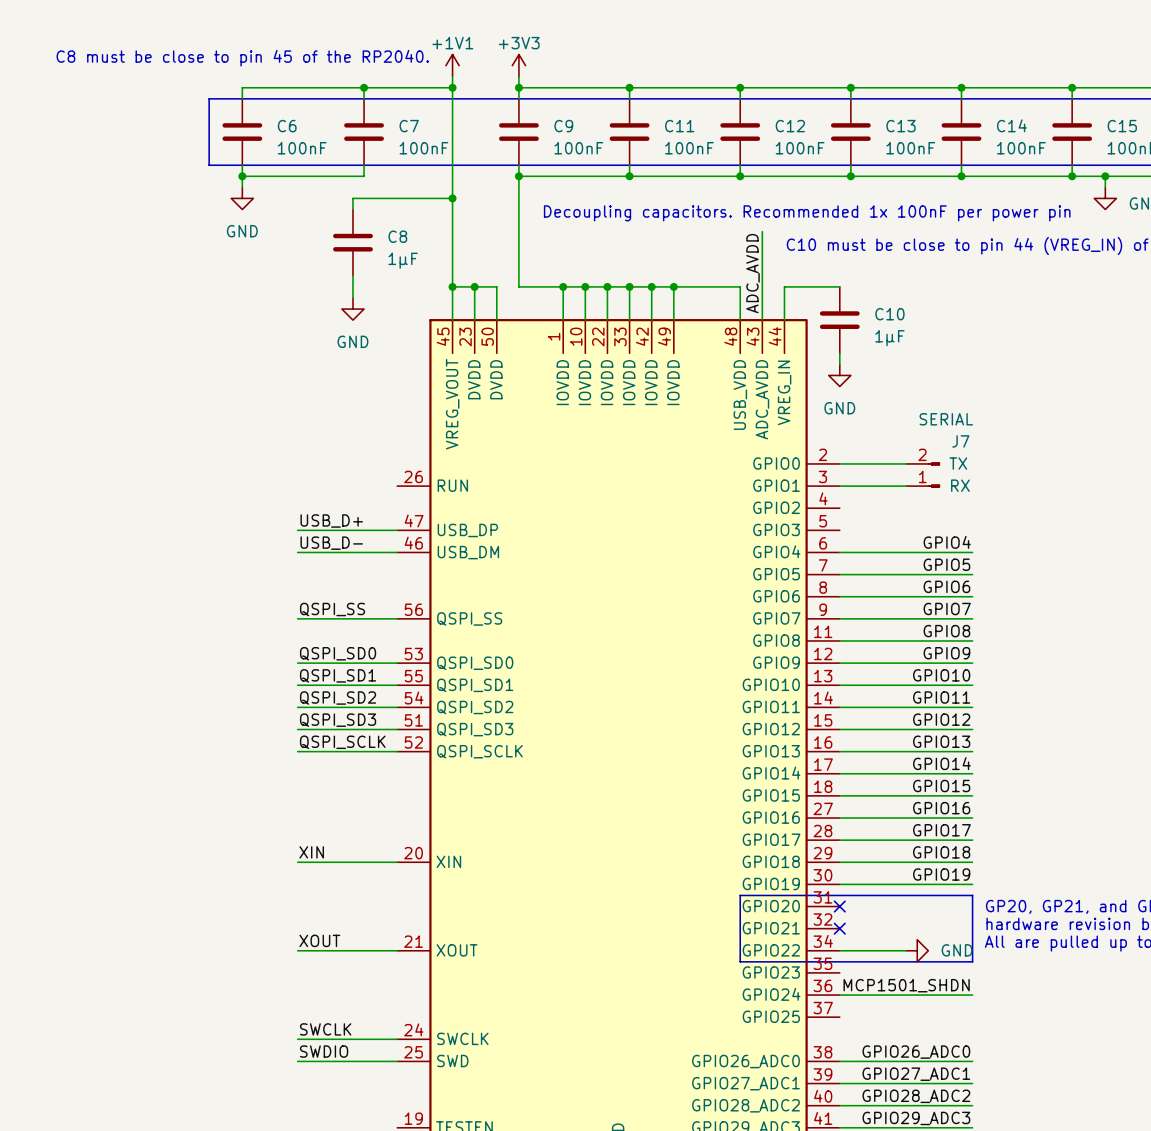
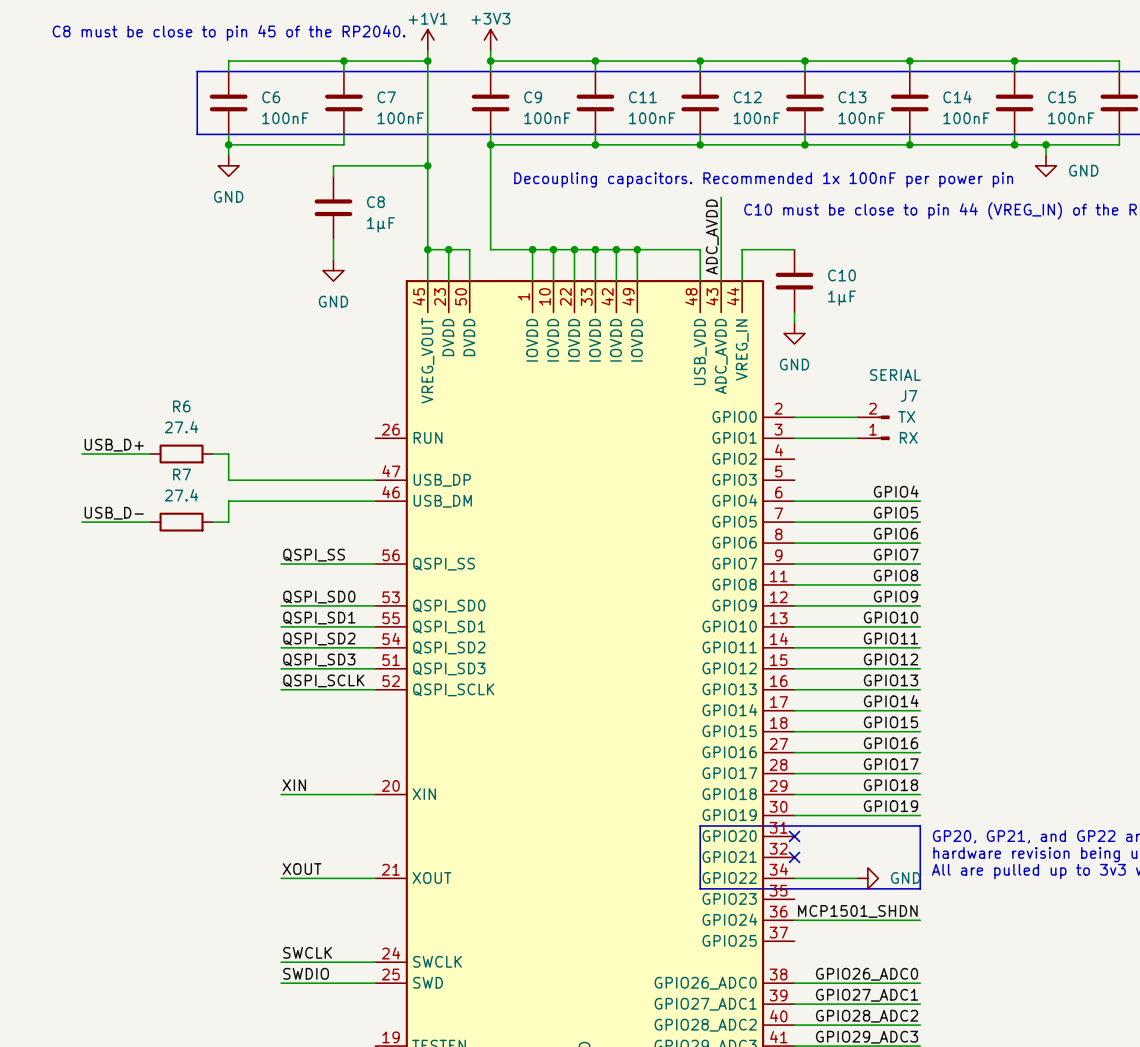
wire: none -> (81, 454) (150, 454)
R6: none -> 27.4 (181, 454)
wire: none -> (212, 454) (228, 454) (228, 480) (281, 480)
label position: USB_D+ (331, 521) -> USB_D+ (114, 445)
label position: USB_D- (331, 543) -> USB_D- (114, 513)
wire: none -> (281, 501) (228, 501) (228, 522) (212, 522)
wire: none -> (81, 522) (150, 522)
R7: none -> 27.4 (181, 522)

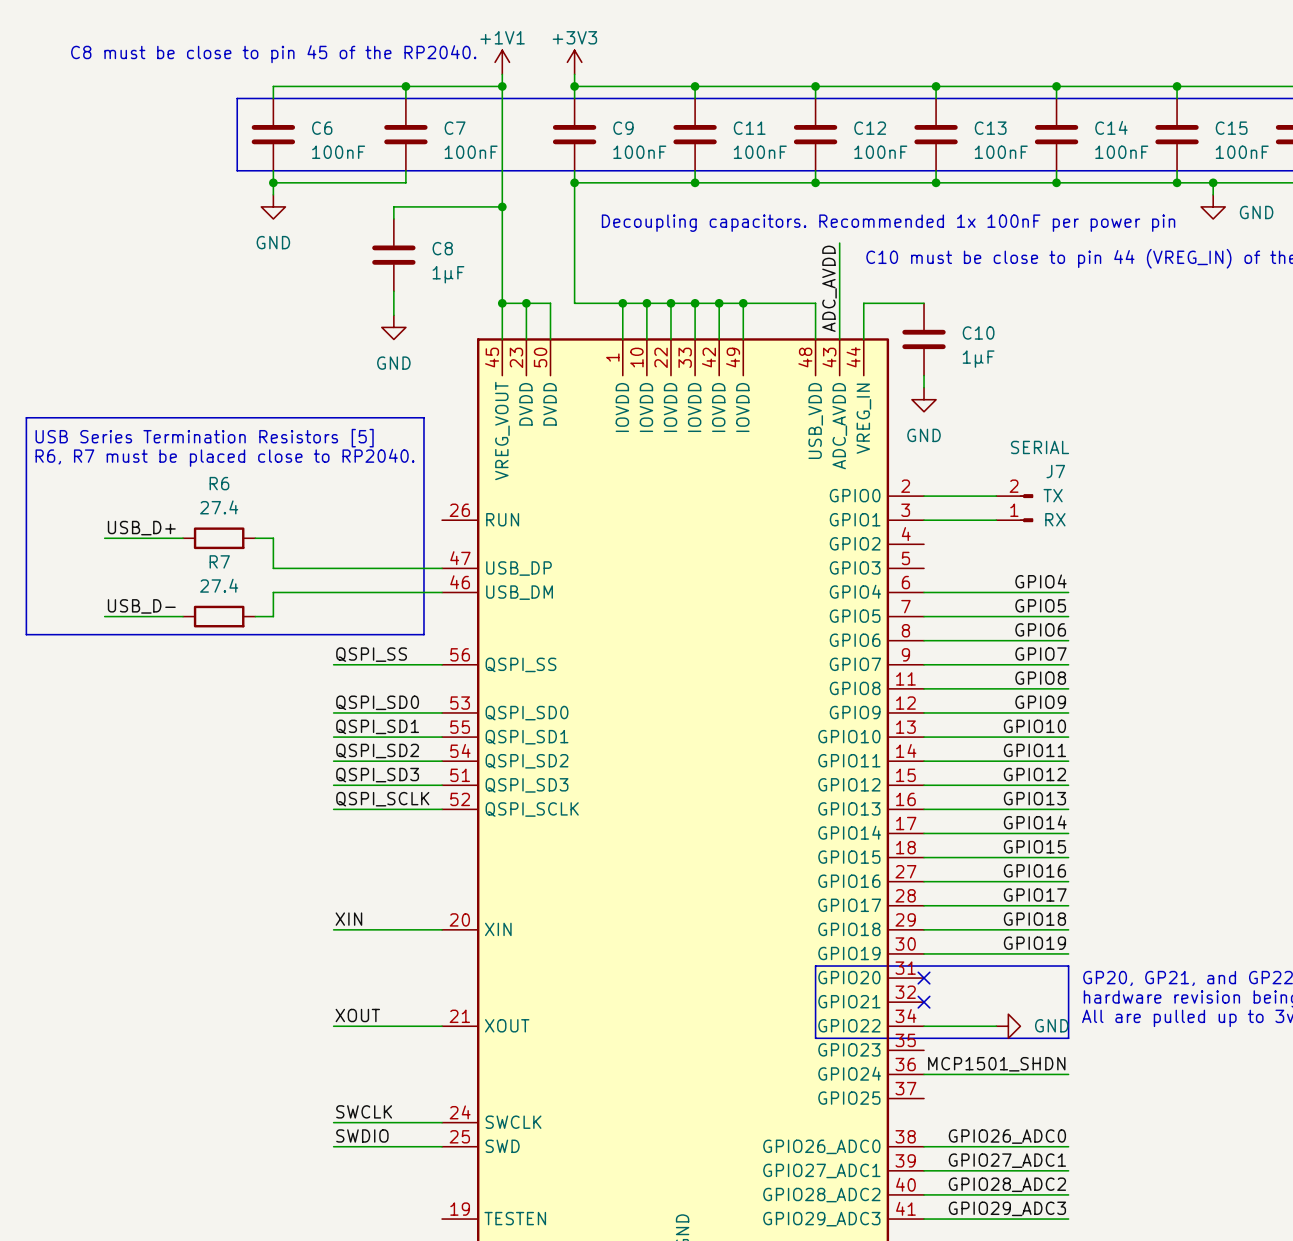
line: none -> (26, 417) (423, 417) (423, 634) (26, 634) (26, 417)
text: none -> USB Series Termination Resistors [5] (204, 438)
text: none -> R6, R7 must be placed close to RP2040. (224, 457)

